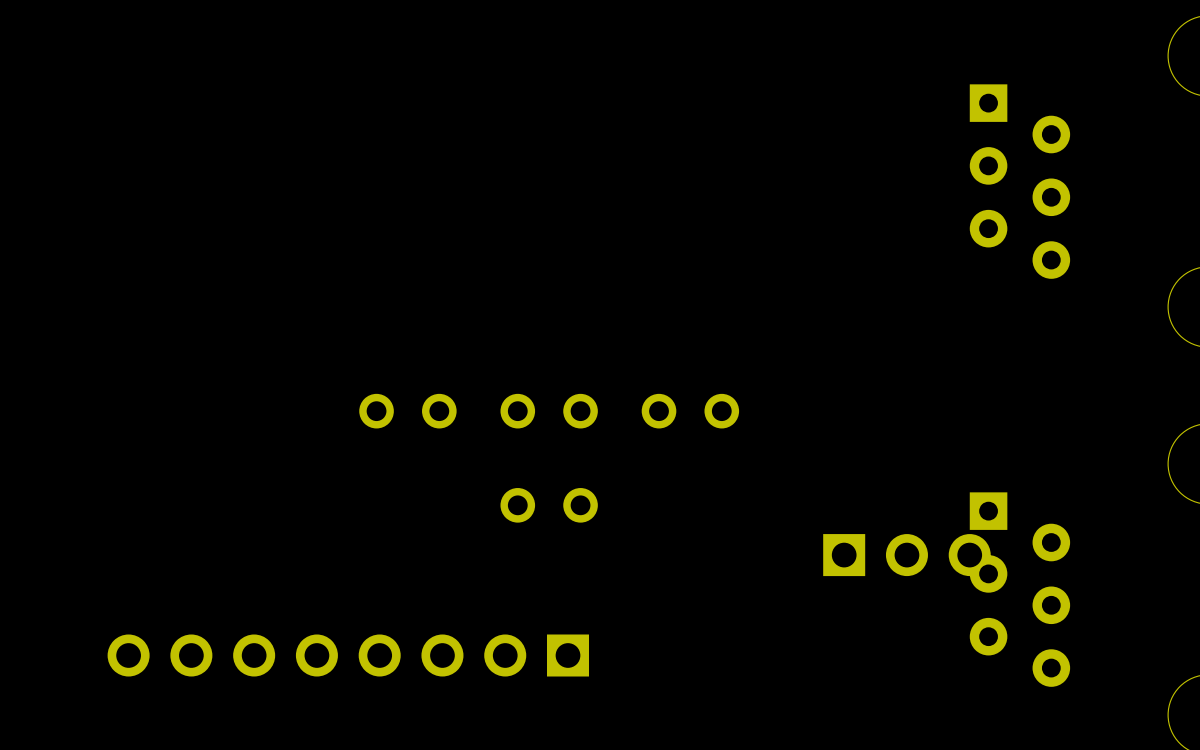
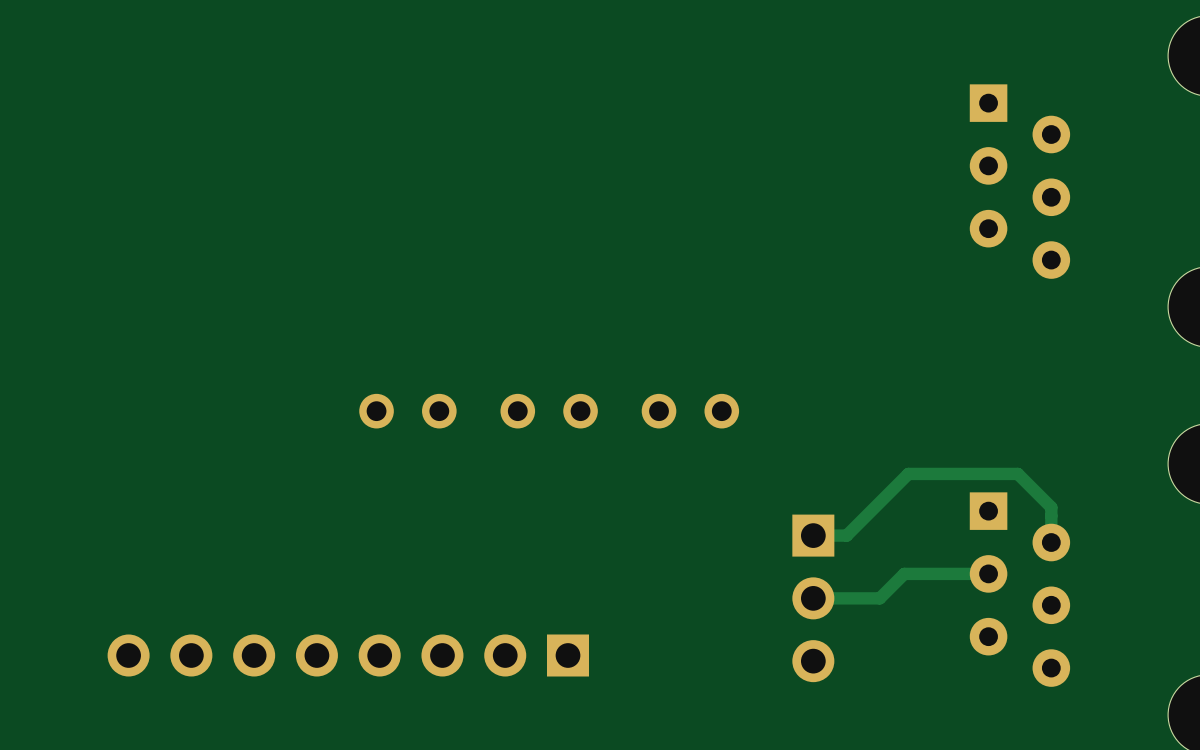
part: (549, 505) -> none
track: none -> (813, 535) (846, 535) (908, 473) (1017, 473) (1051, 507) (1051, 542)
part rotation: 0° (906, 555) -> 90° clockwise (813, 598)
part position: (906, 555) -> (813, 598)
track: none -> (988, 573) (904, 573) (879, 598) (813, 598)

